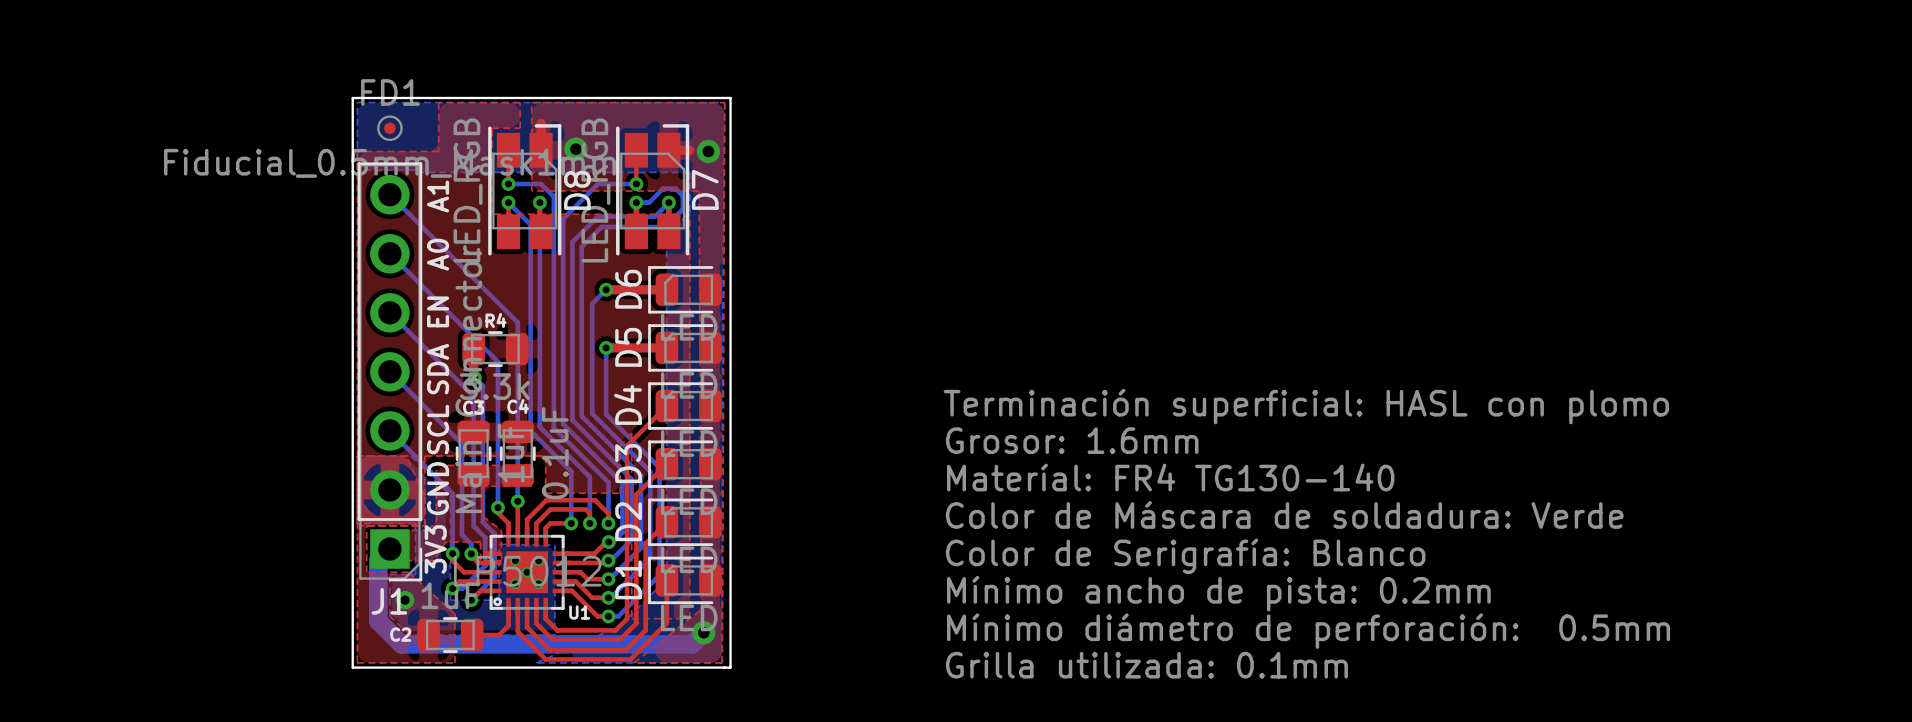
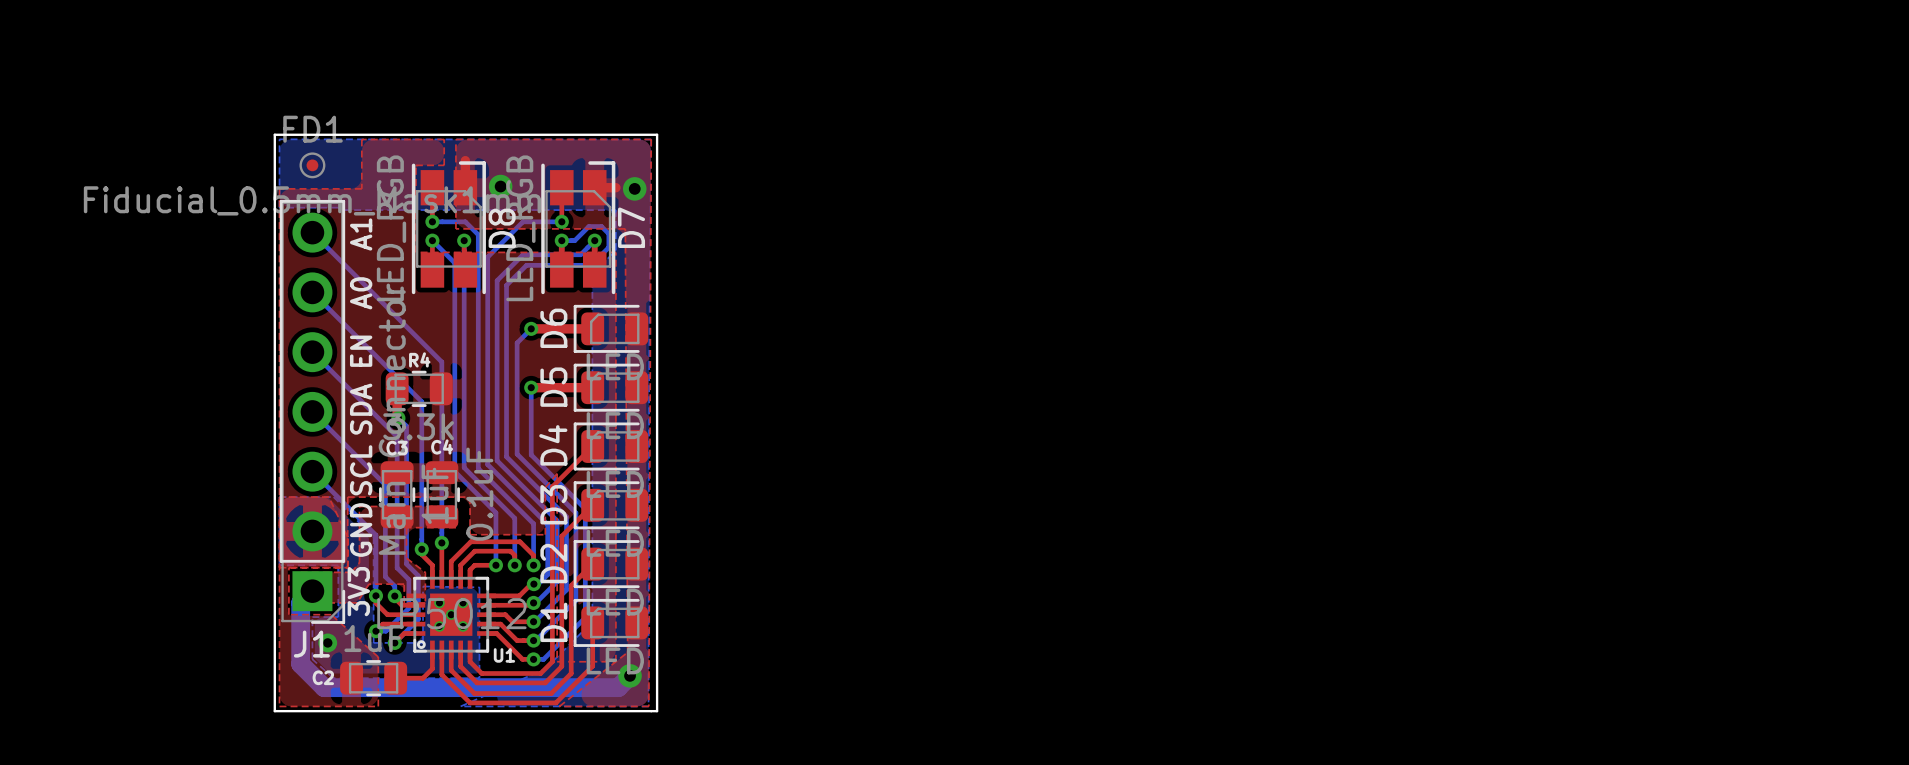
text: Terminación superficial: HASL con plomo (1306, 406) -> none
text: Grosor: 1.6mm (1072, 440) -> none
text: Materíal: FR4 TG130-140 (1170, 477) -> none
text: Color de Máscara de soldadura: Verde (1284, 514) -> none
text: Color de Serigrafía: Blanco (1185, 556) -> none
text: Mínimo ancho de pista: 0.2mm (1218, 593) -> none
text: Mínimo diámetro de perforación: 0.5mm (1308, 631) -> none
text: Grilla utilizada: 0.1mm (1146, 665) -> none

